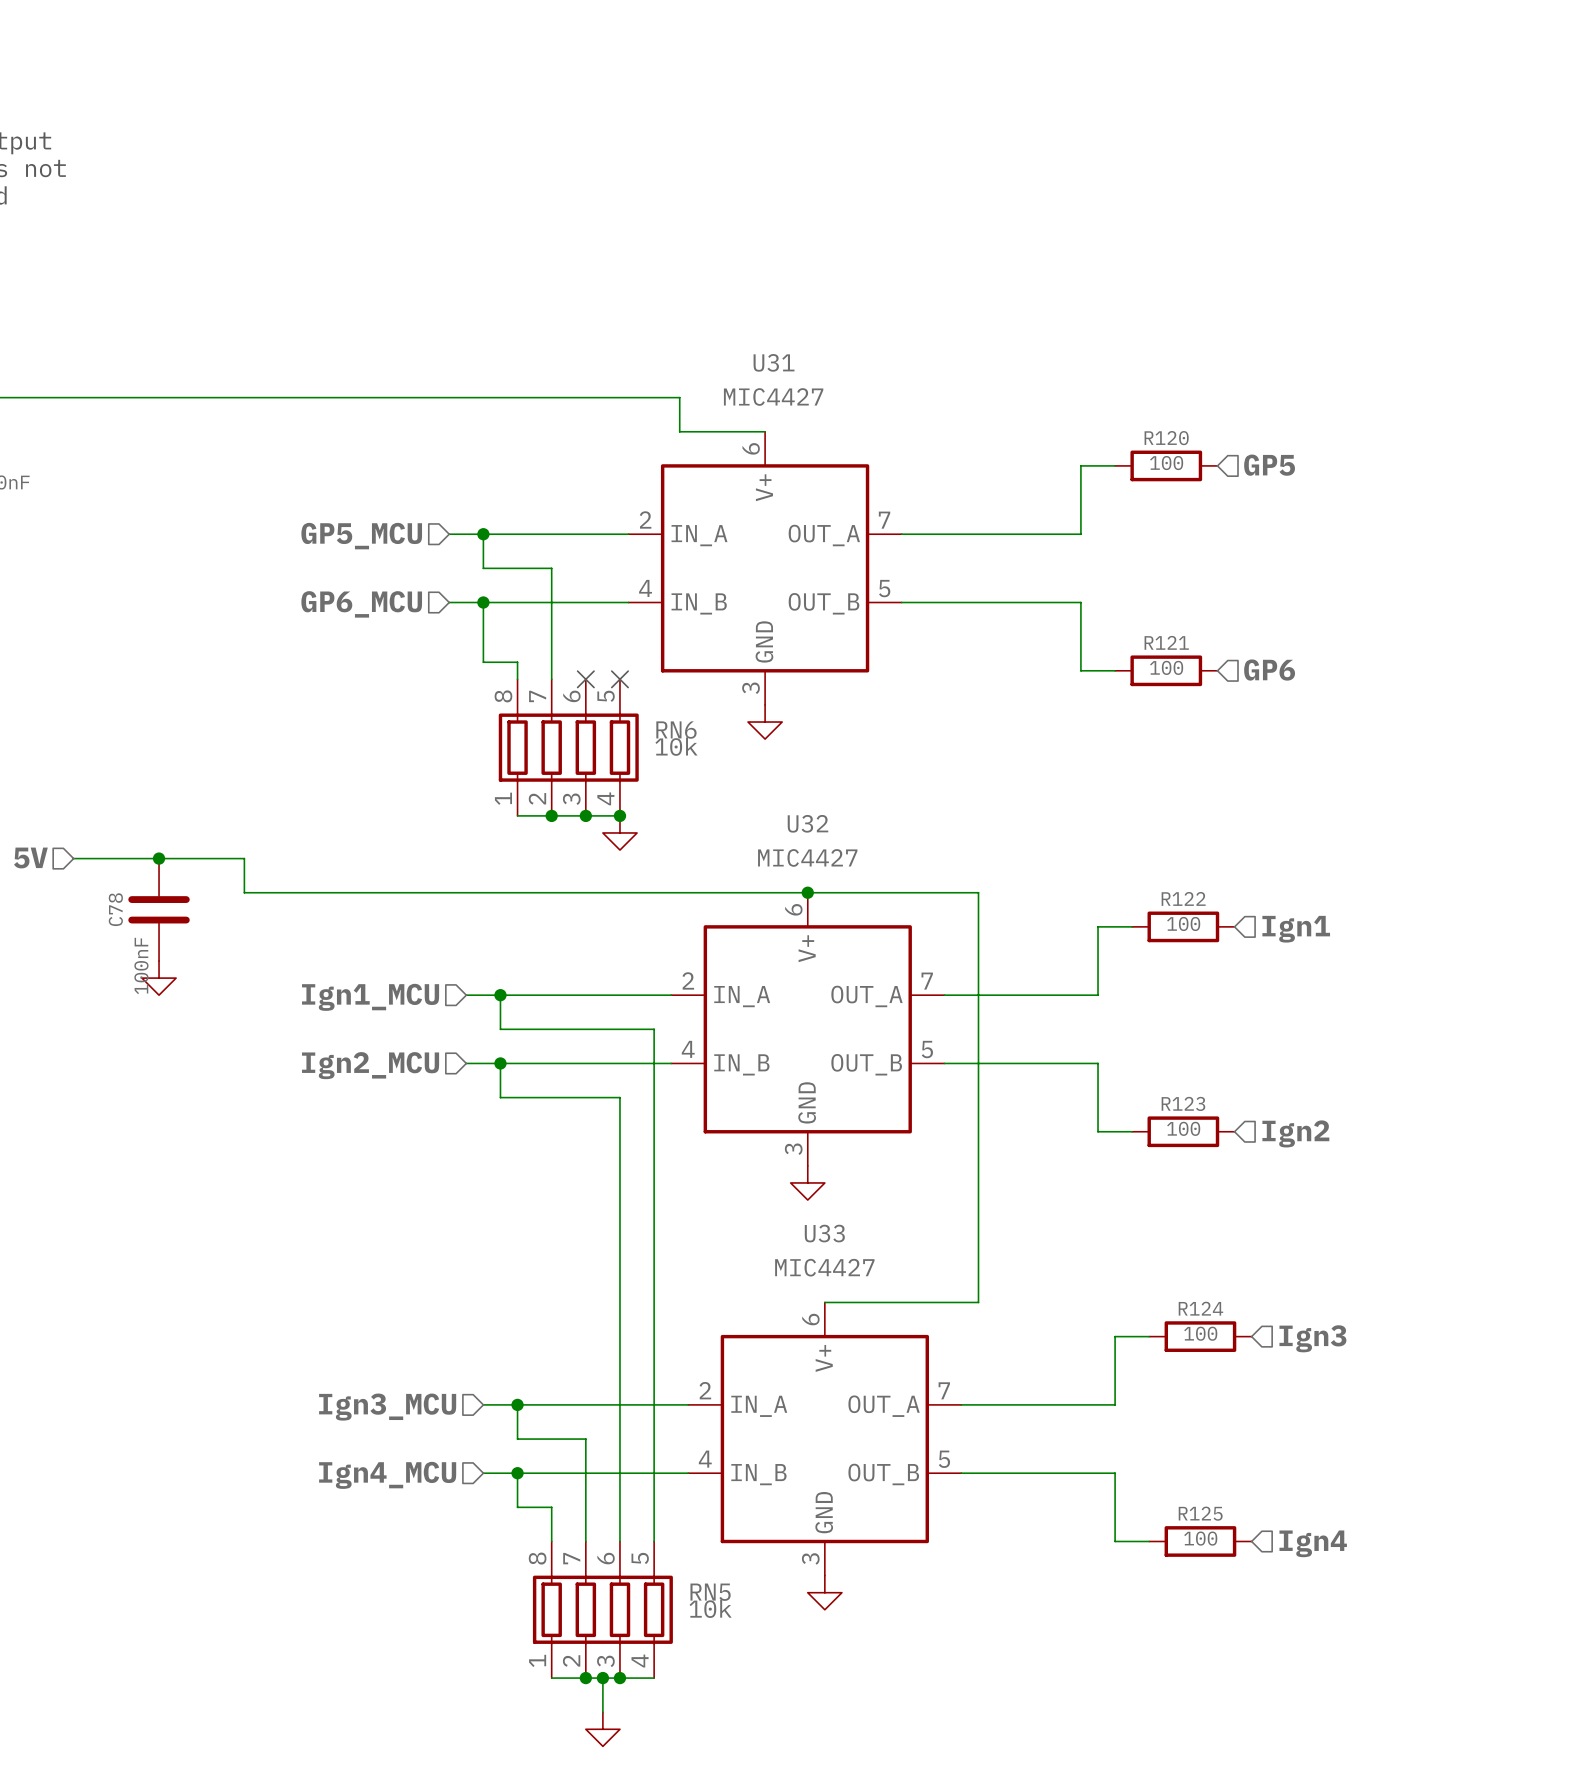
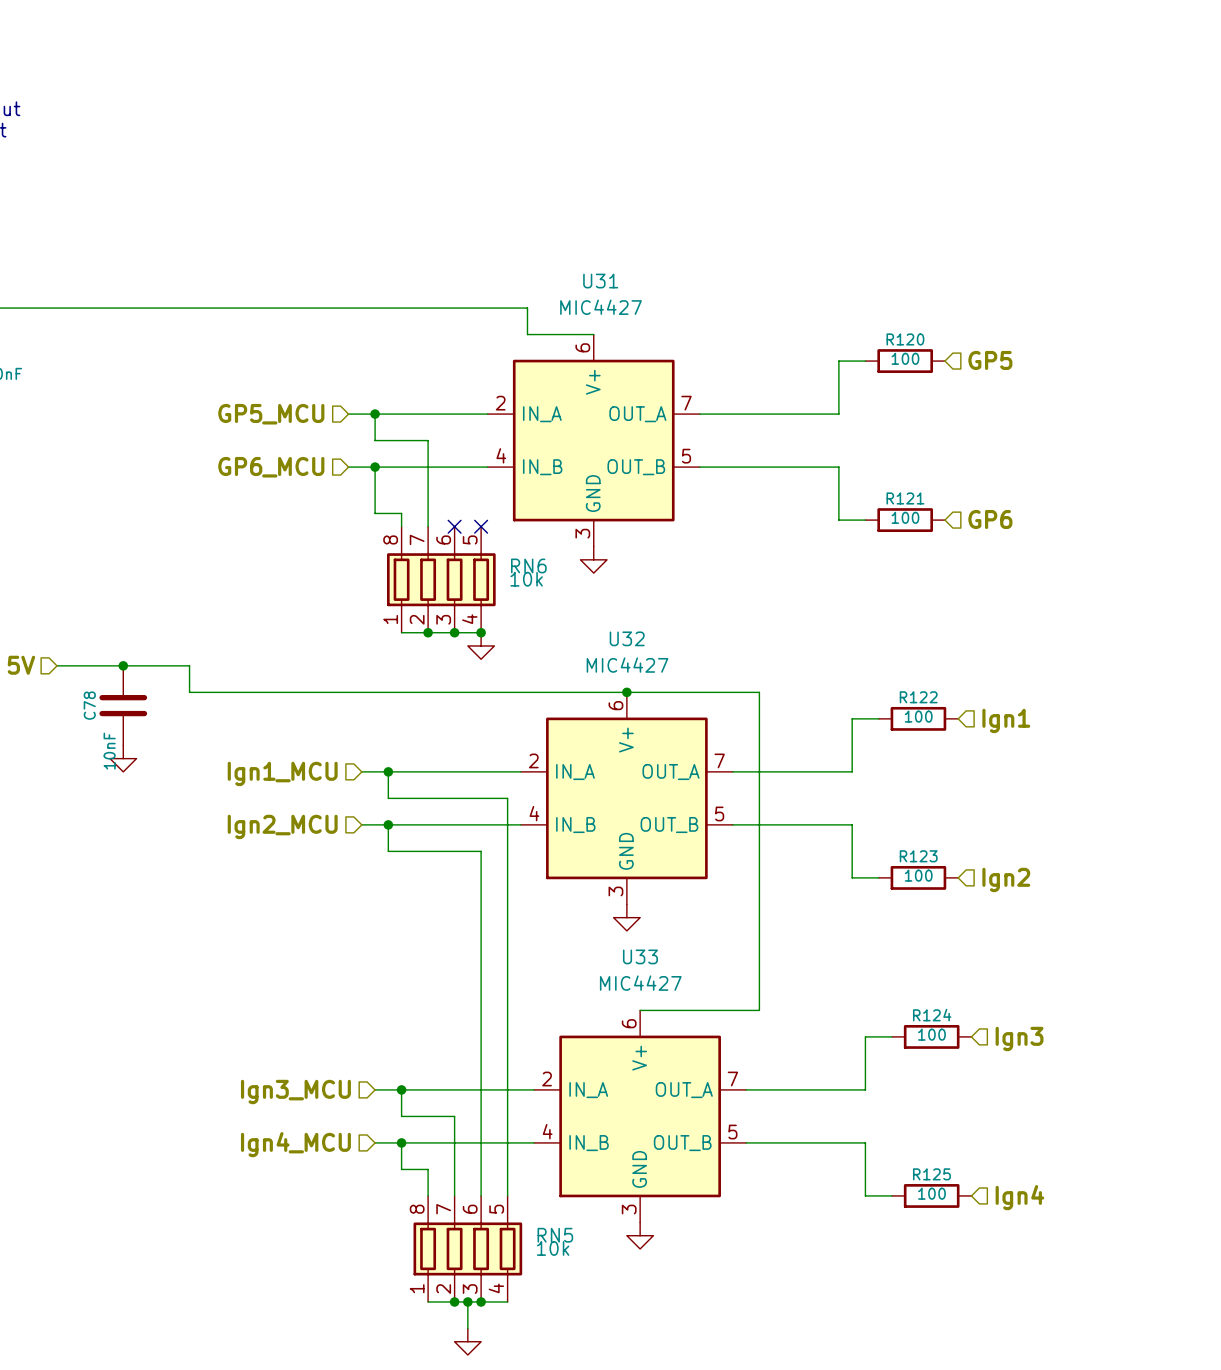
C78 value: 100nF (141, 965) -> 10nF (109, 751)

